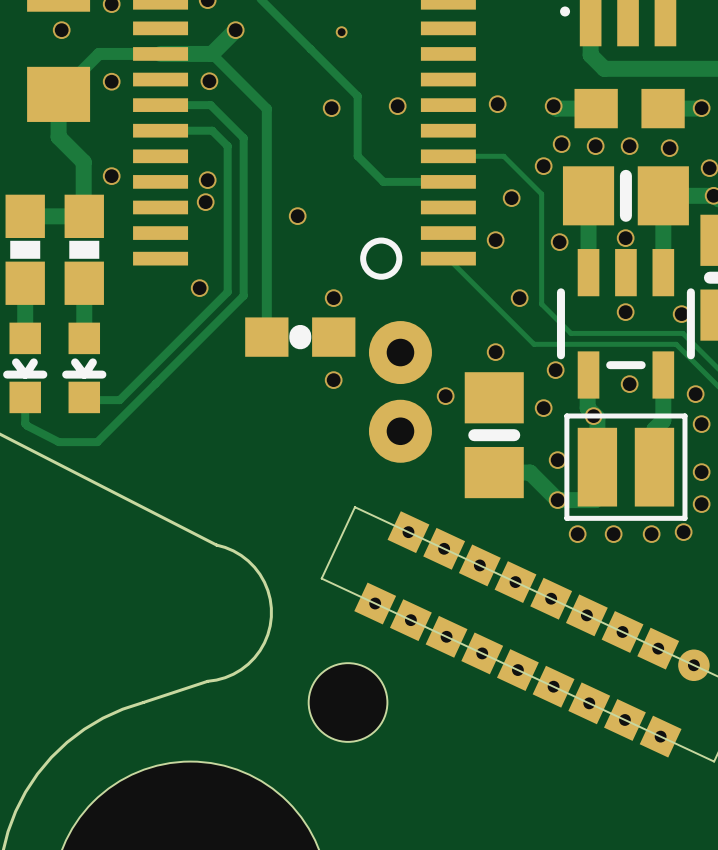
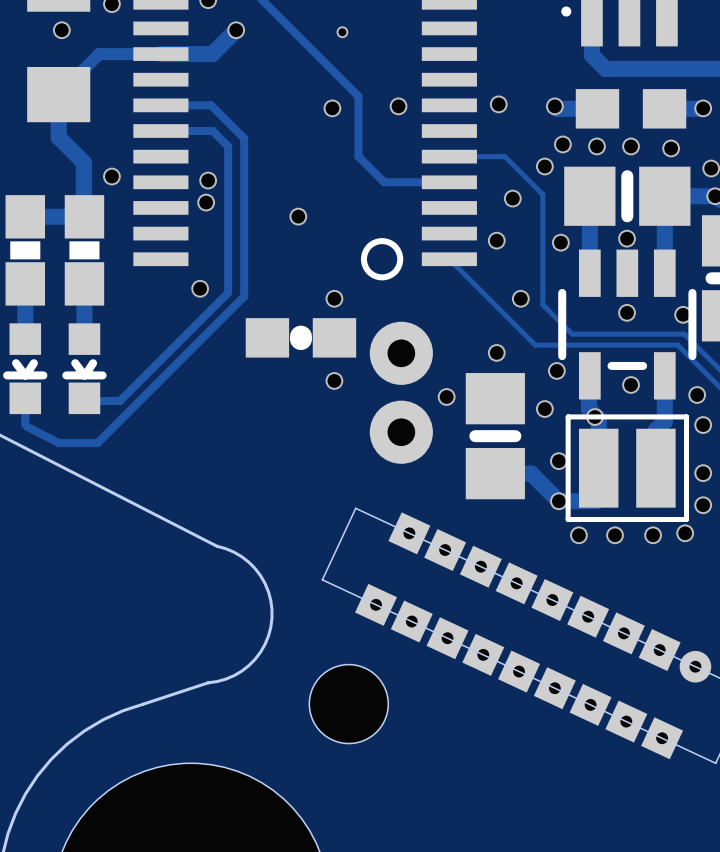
track: (211, 53) (266, 108) (266, 337) -> none
via: (111, 81) -> none
via: (209, 81) -> none

